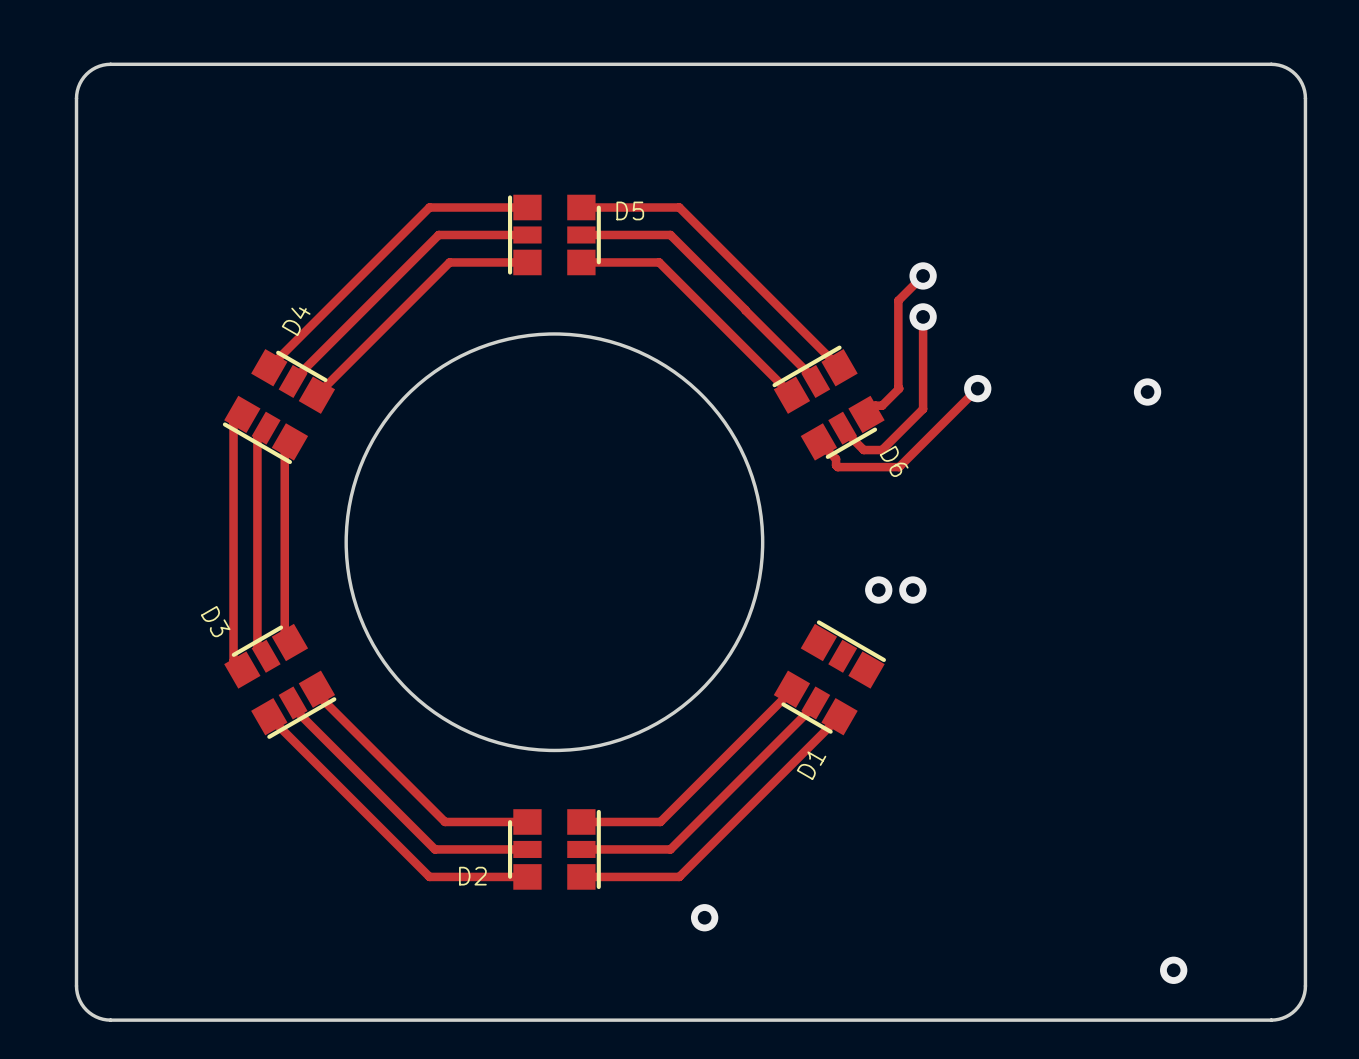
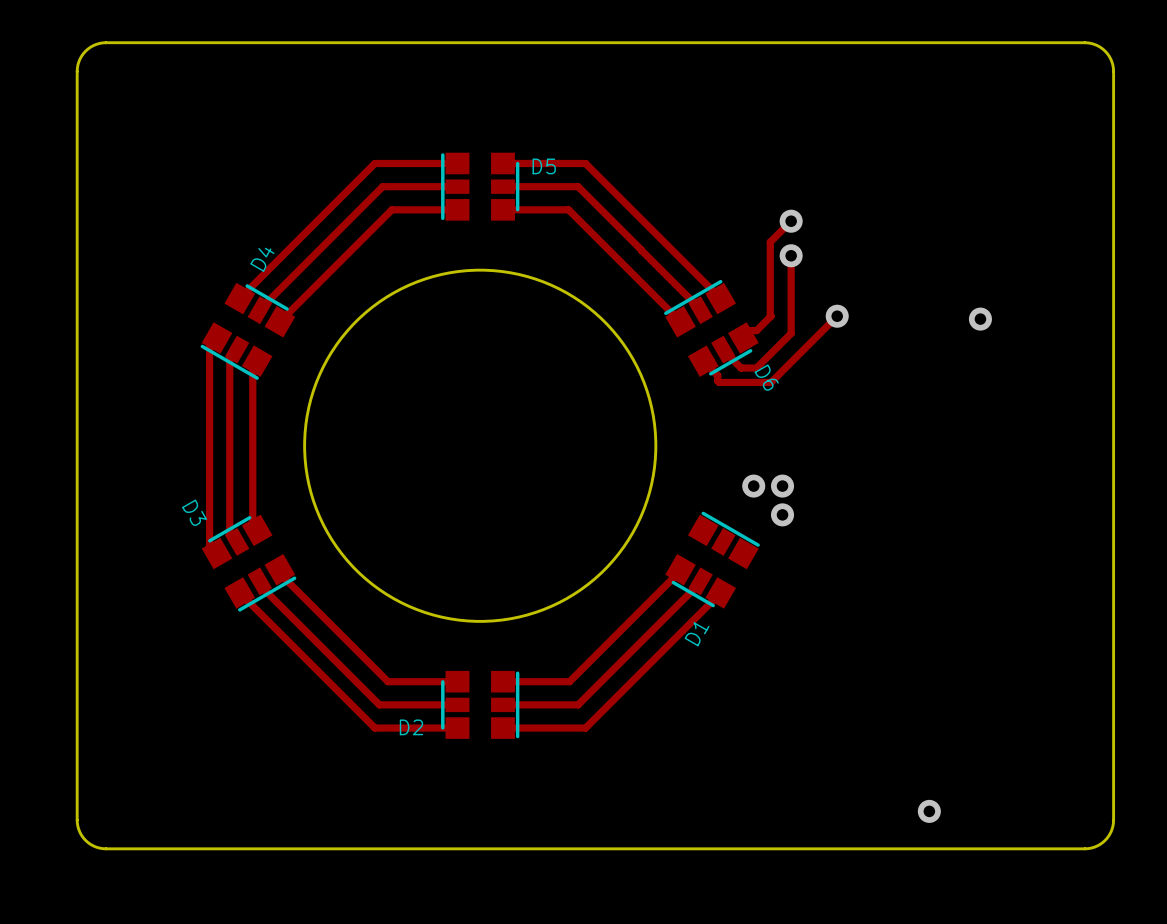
via: none -> (782, 514)
via: (704, 917) -> none
via position: (1173, 970) -> (929, 811)

